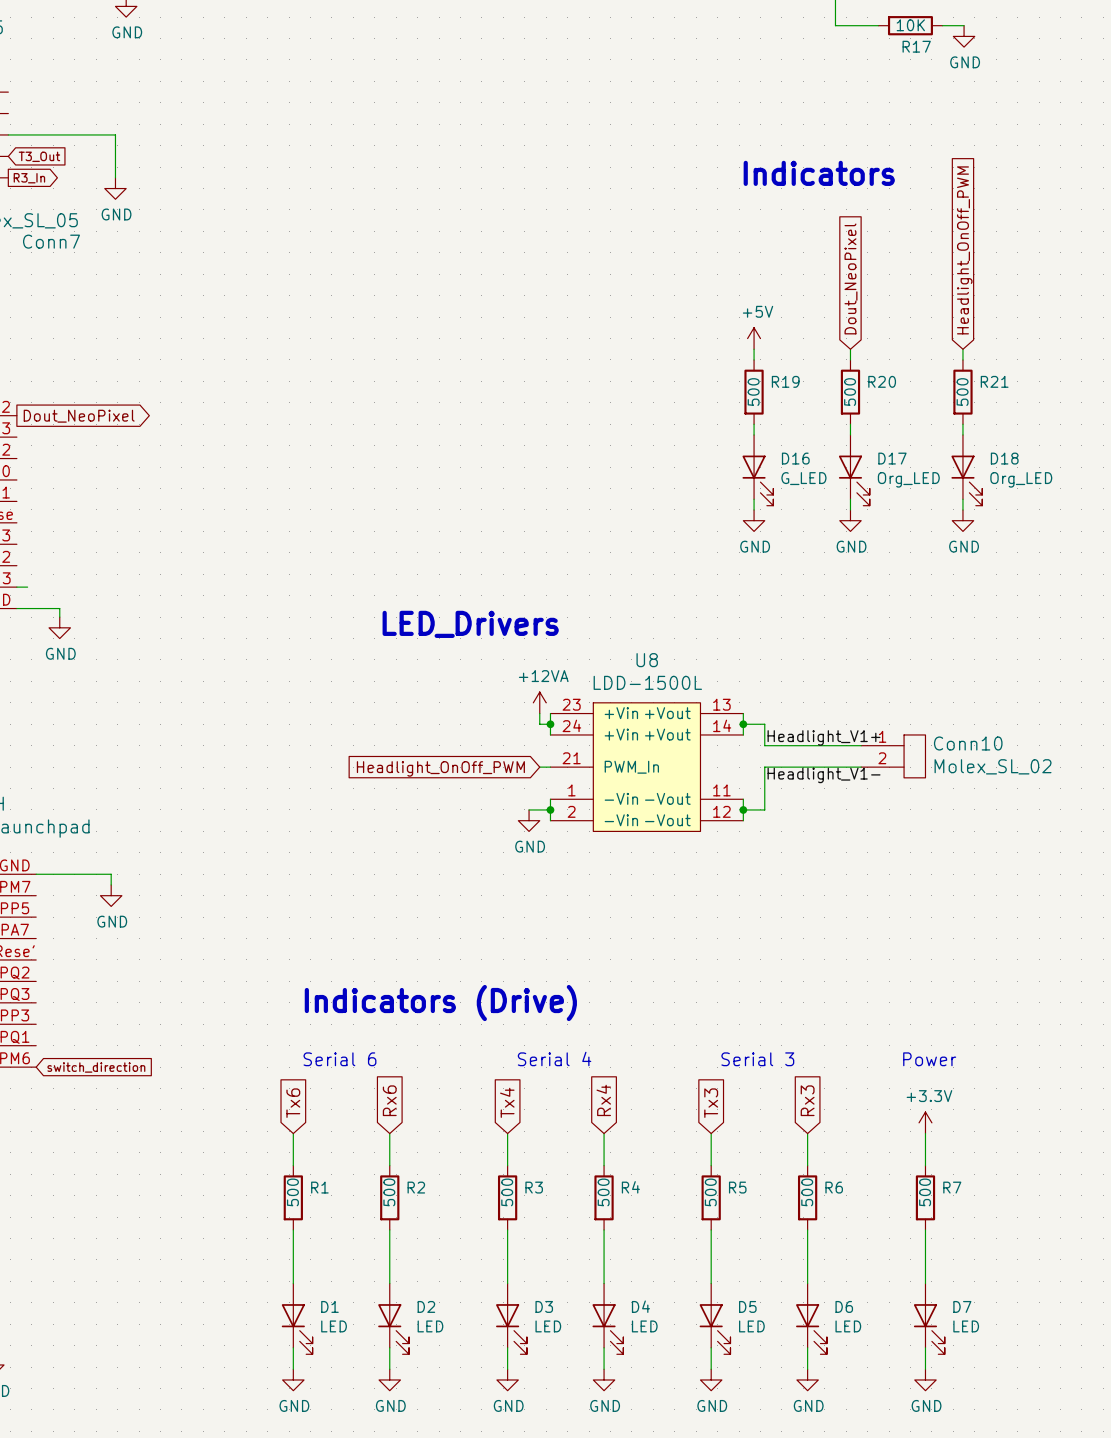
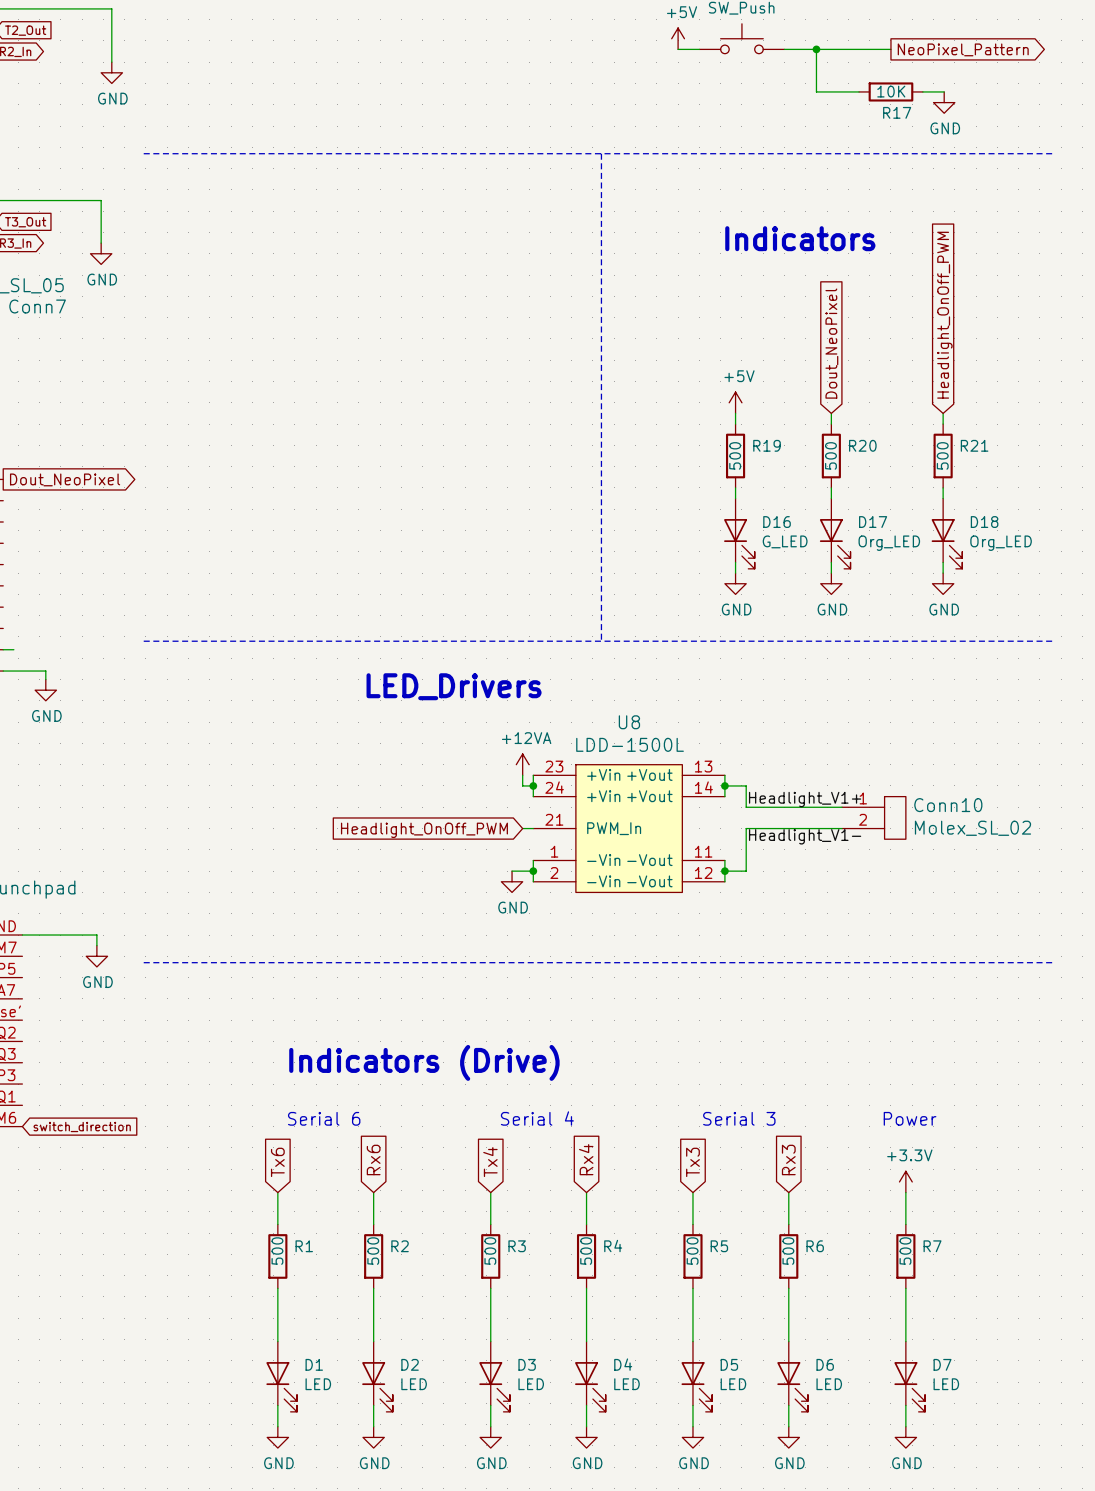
line: none -> (143, 153) (1052, 153)
line: none -> (601, 153) (601, 641)
line: none -> (143, 641) (1052, 641)
line: none -> (143, 962) (1052, 962)

